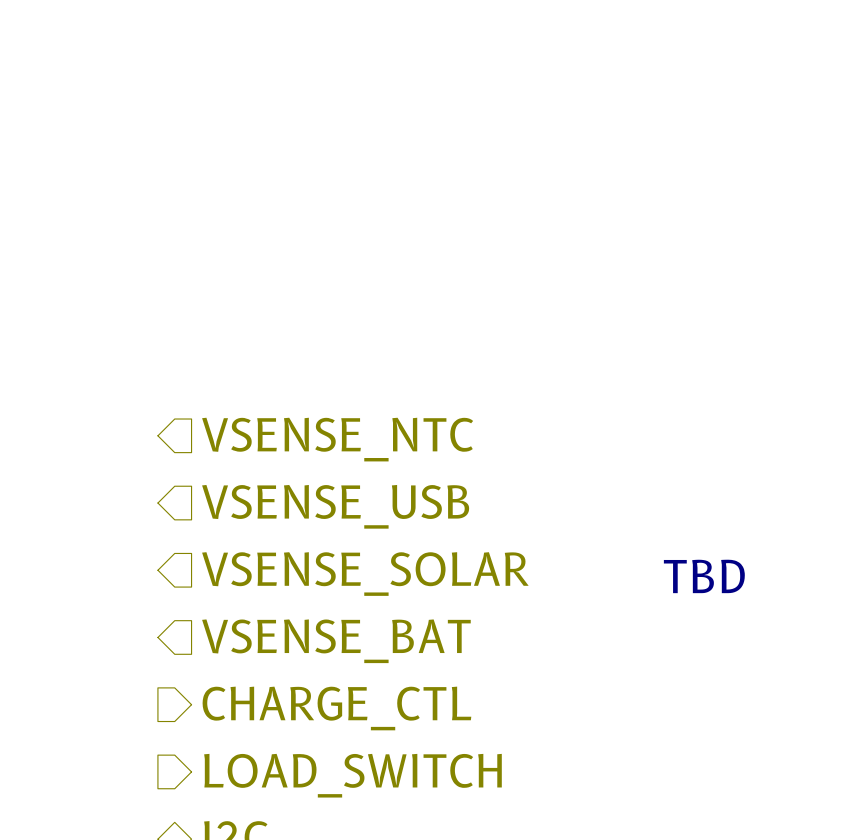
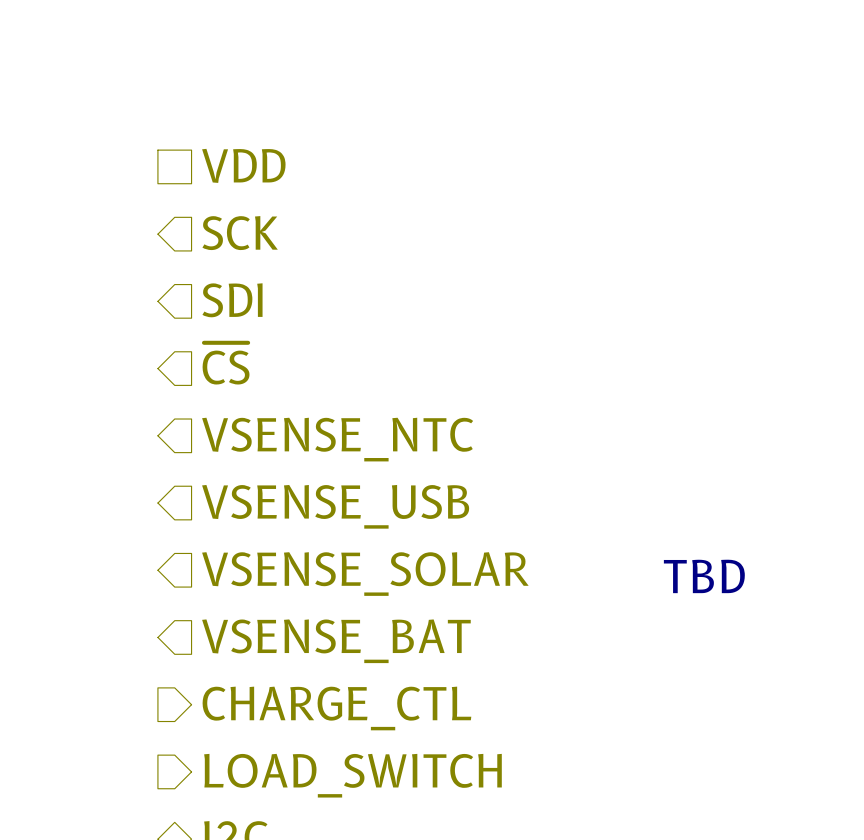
hierarchical label: none -> VDD (243, 165)
hierarchical label: none -> SCK (240, 233)
hierarchical label: none -> SDI (232, 300)
hierarchical label: none -> ~{CS} (226, 363)

